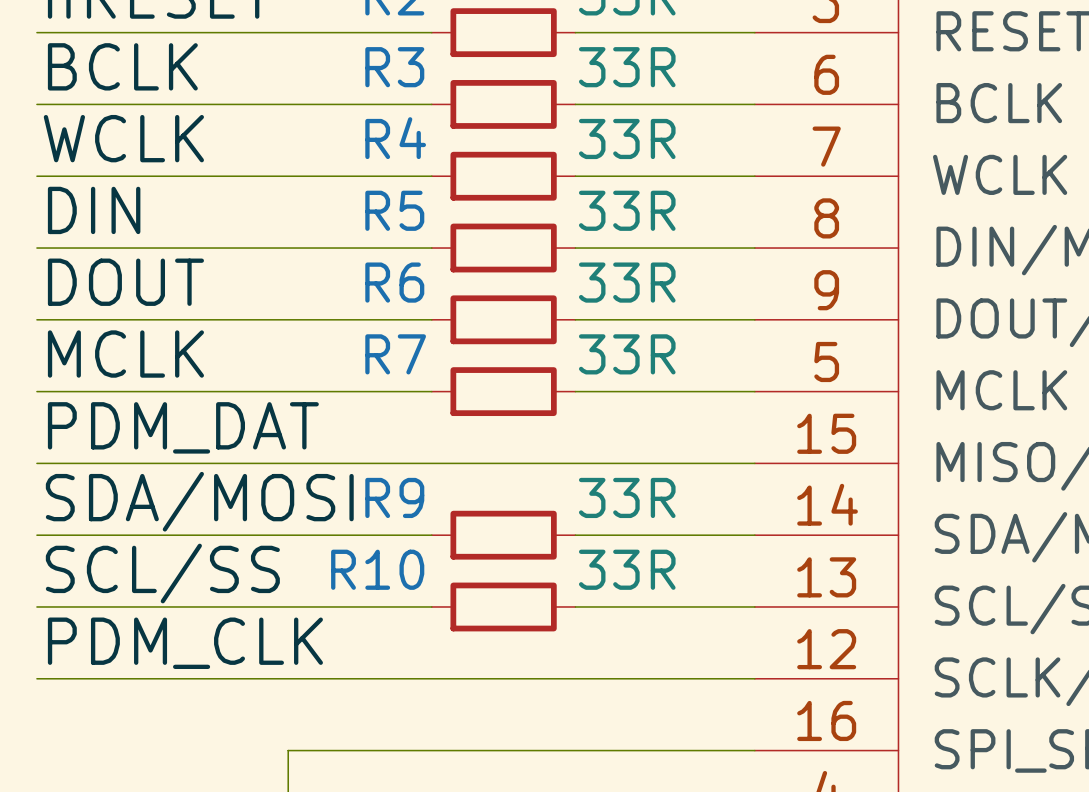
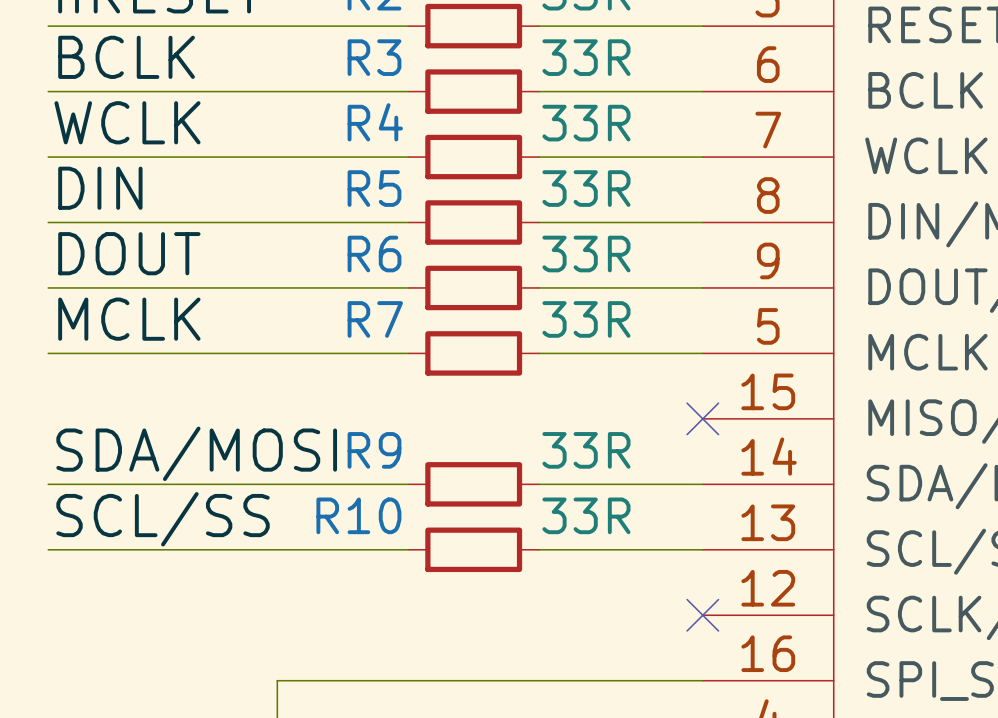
label: PDM_DAT (183, 427) -> none
wire: (36, 463) (754, 463) -> none
no-connect mark: none -> (702, 418)
label: PDM_CLK (185, 643) -> none
wire: (36, 678) (754, 678) -> none
no-connect mark: none -> (702, 615)

